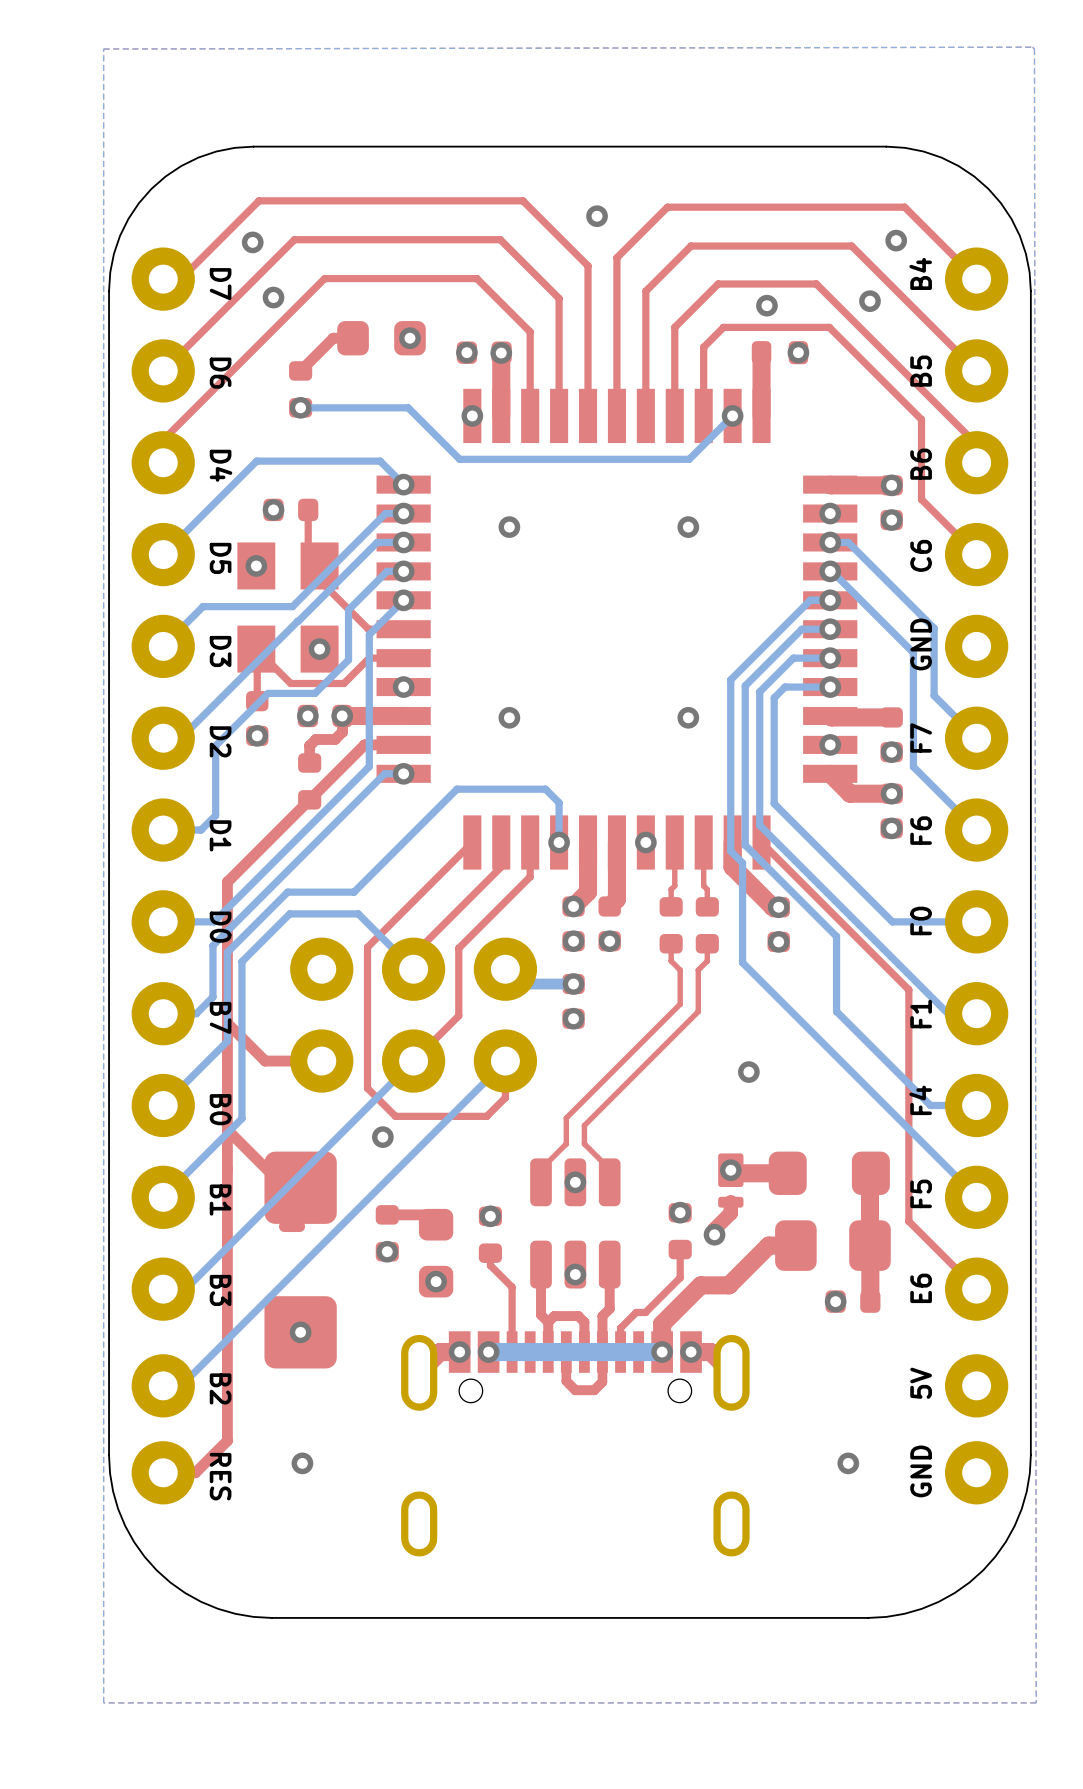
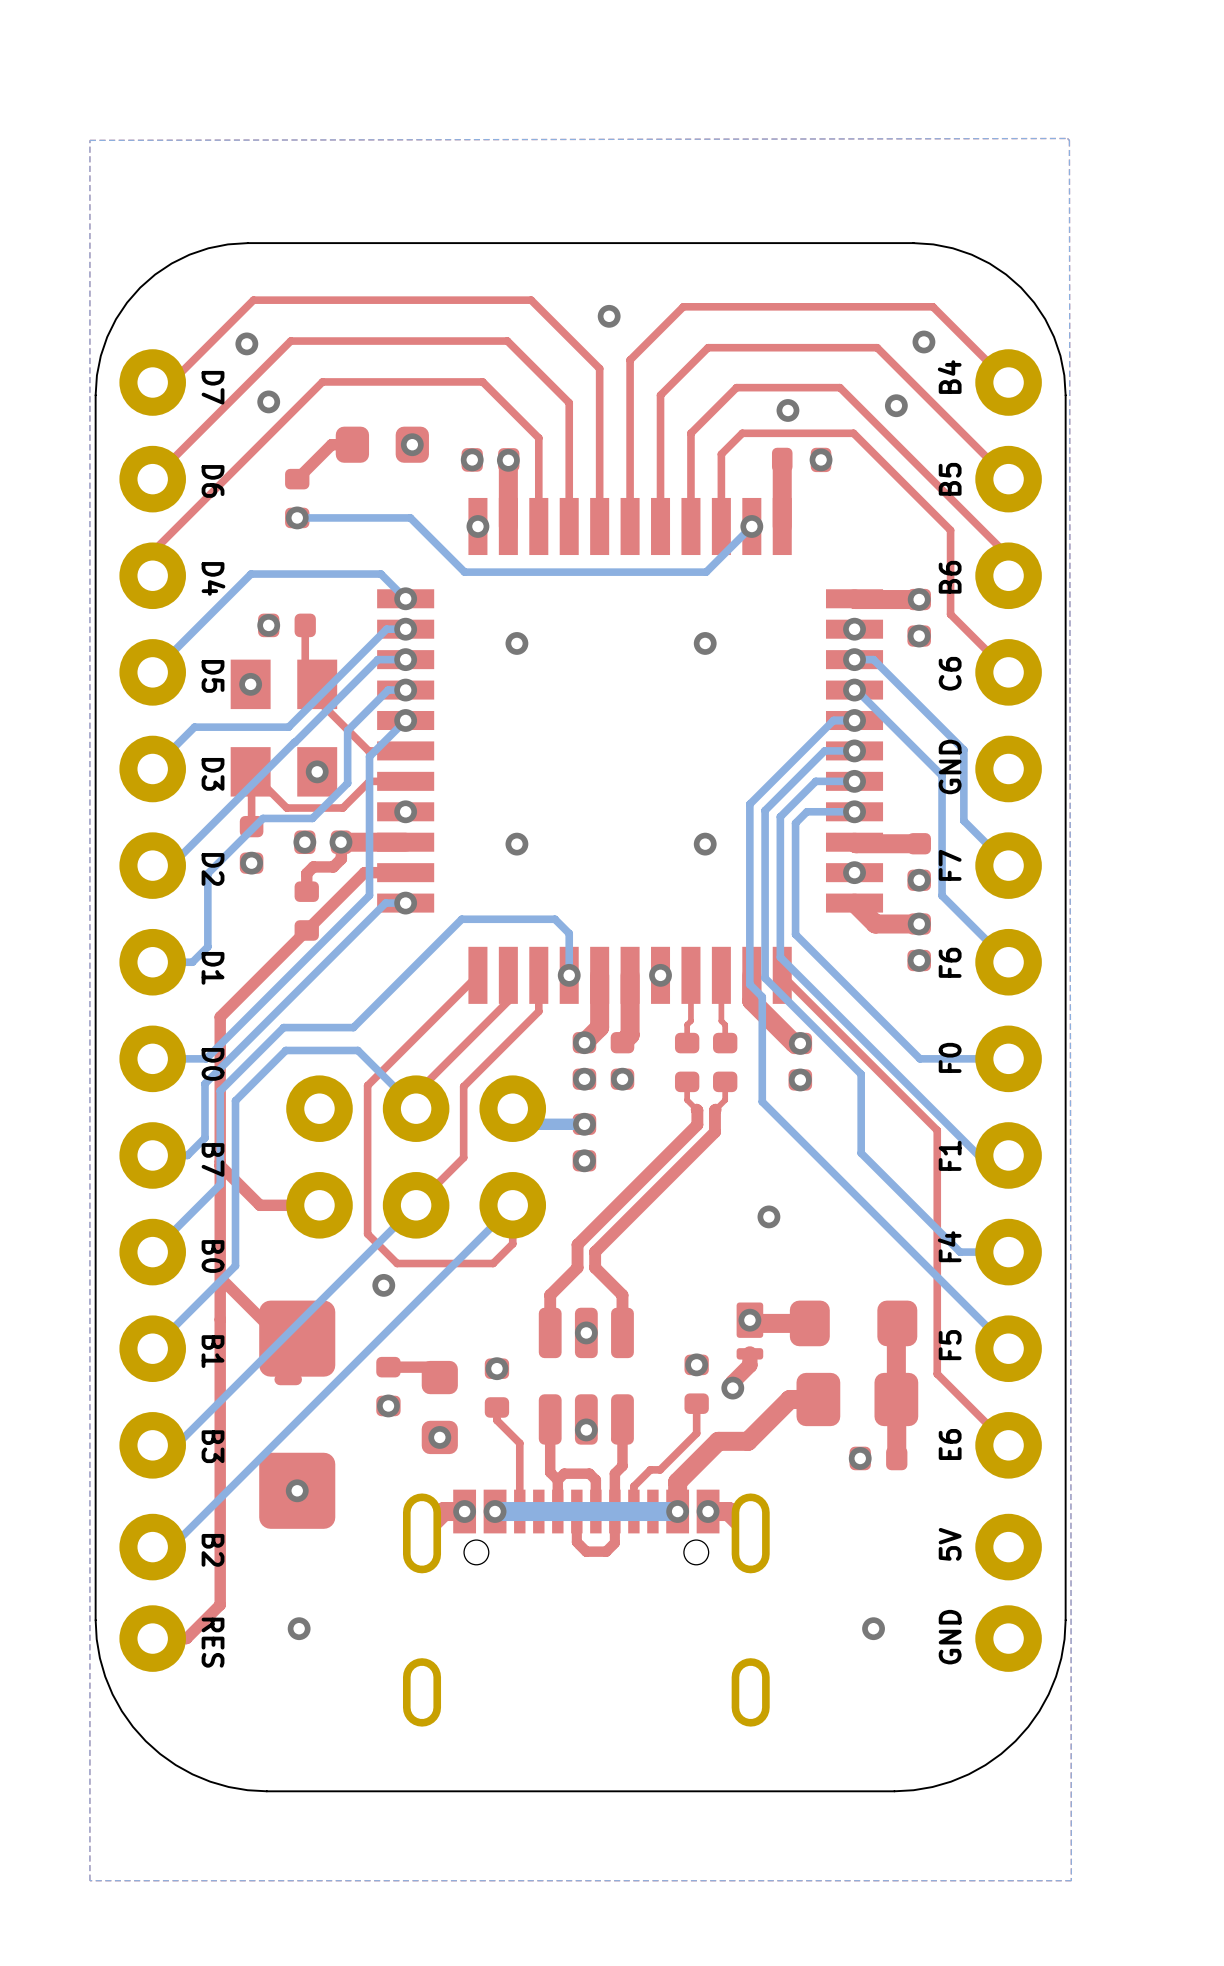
top track: (680, 970) (680, 1004) (566, 1118) (566, 1143) (541, 1169) -> (696, 1109) (697, 1124) (577, 1244) (577, 1267) (550, 1295) (550, 1319)
top track: (698, 970) (698, 1011) (584, 1125) (584, 1143) (609, 1169) -> (715, 1109) (714, 1132) (595, 1251) (595, 1267) (622, 1295) (622, 1319)

